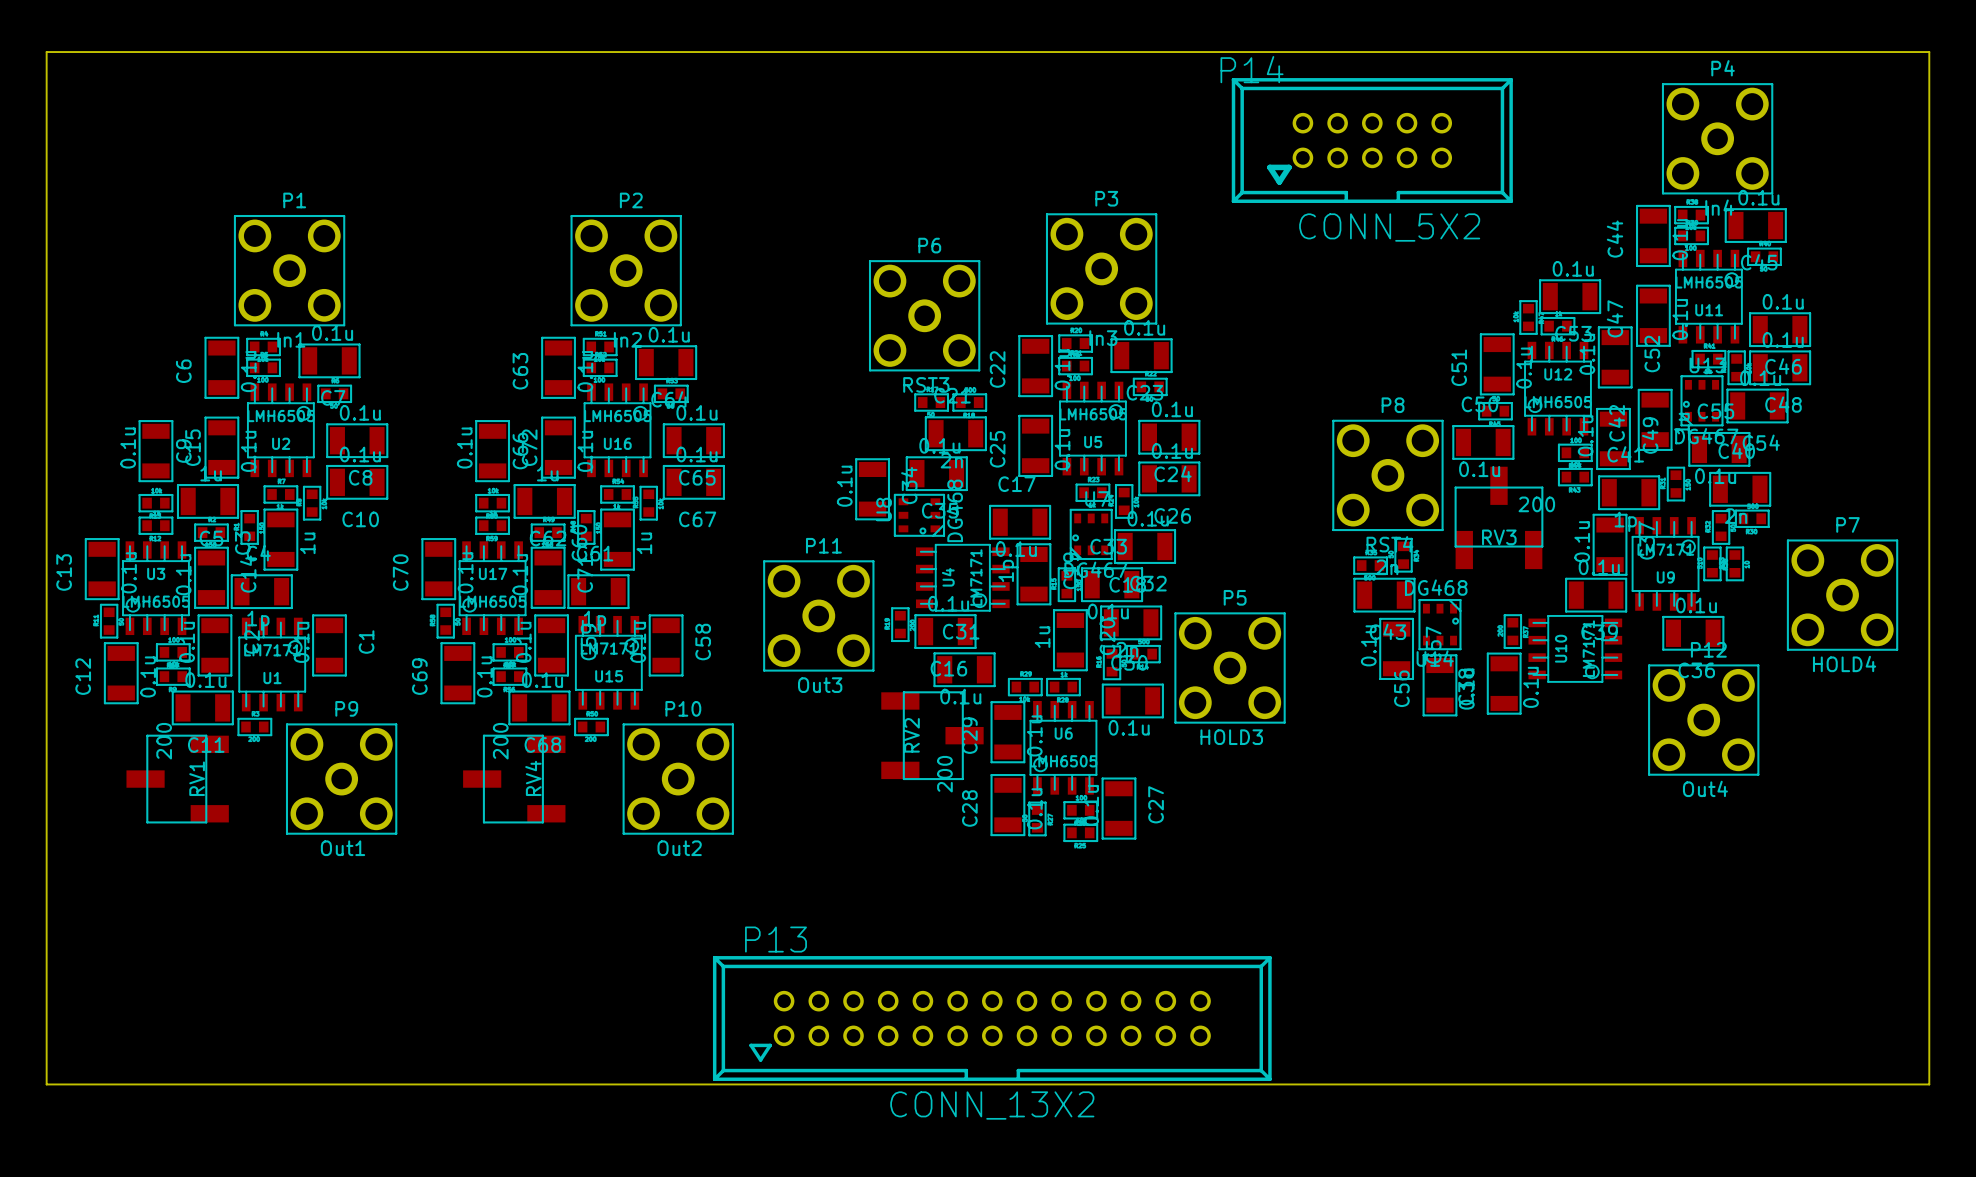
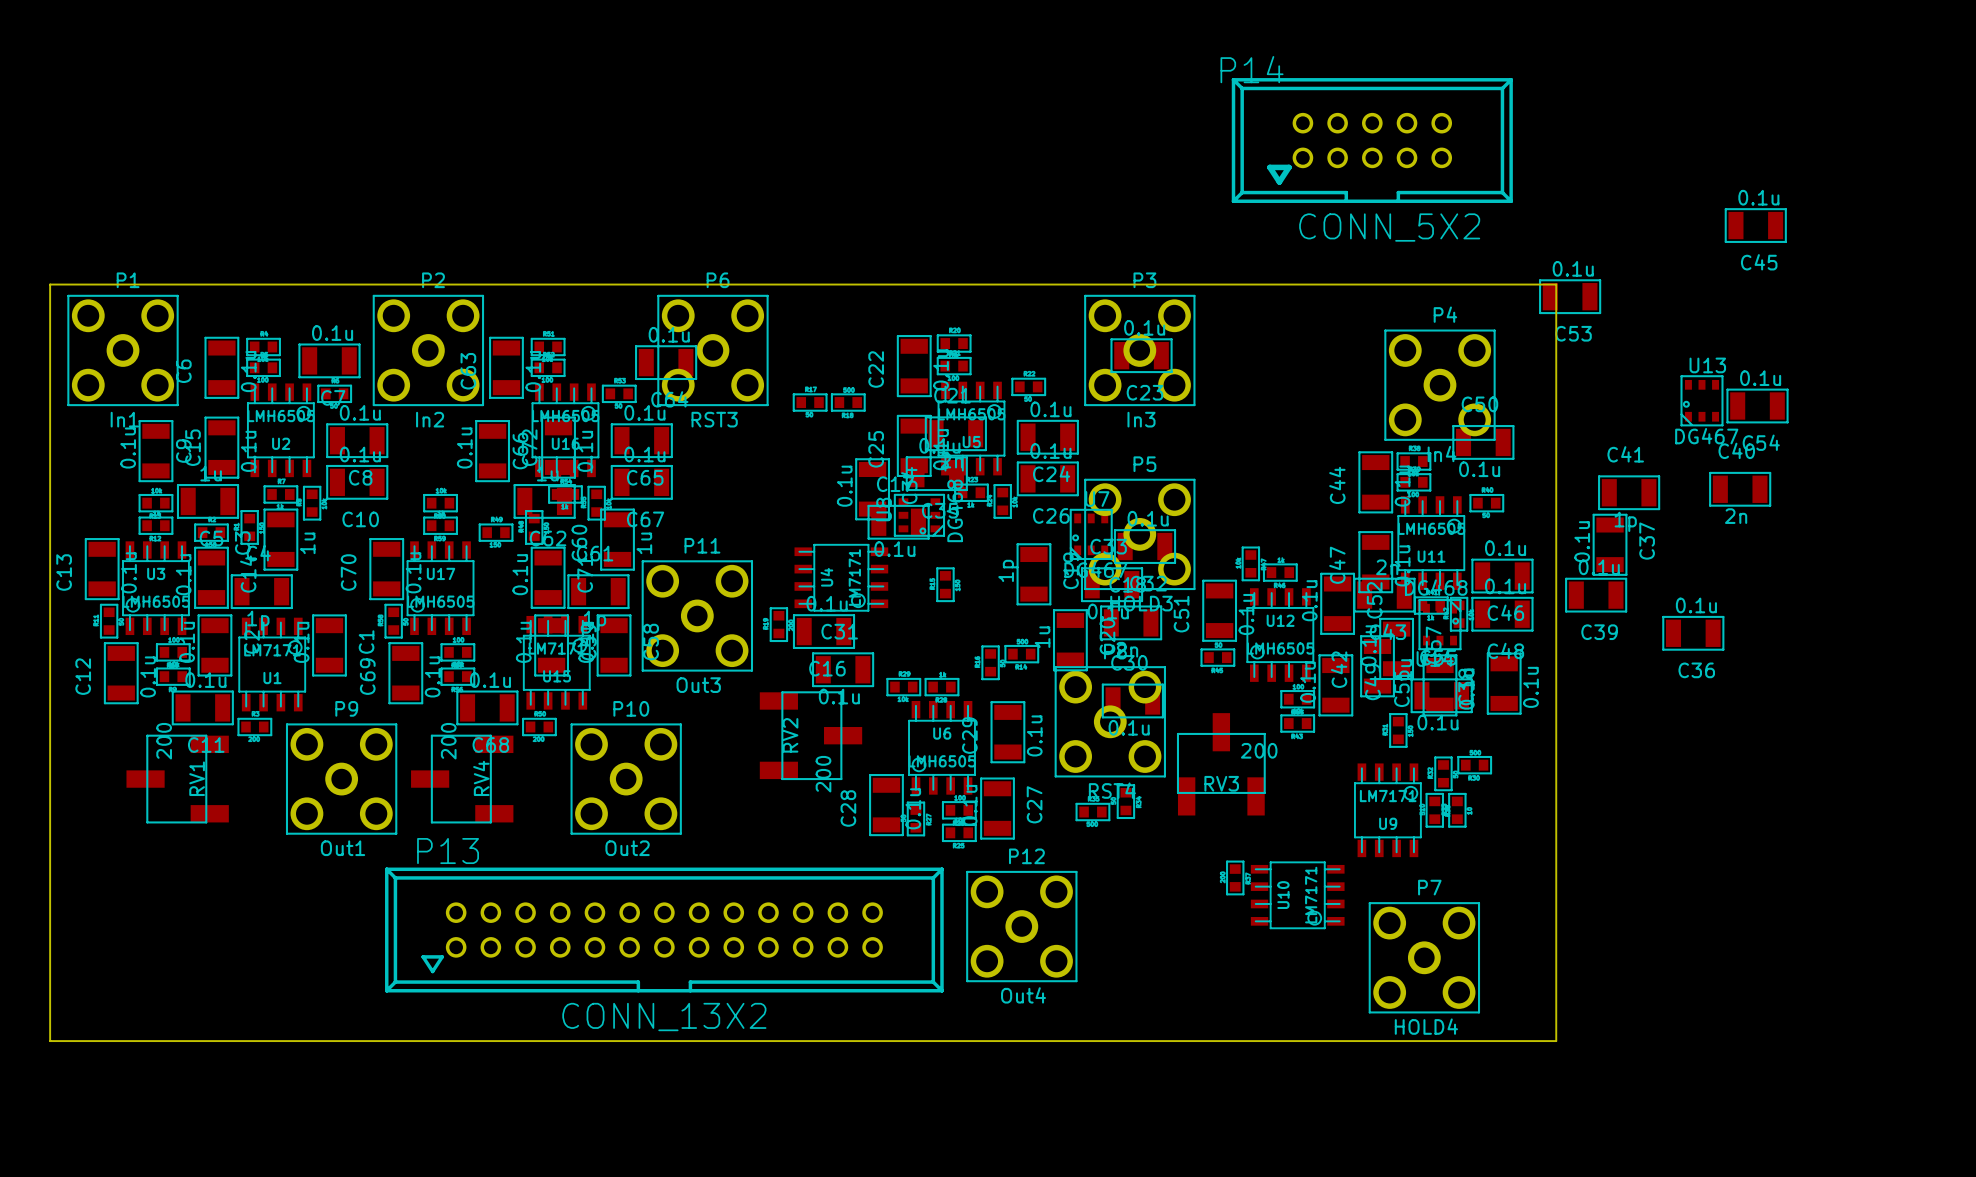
board edge: (46, 52) (46, 1084) (1929, 1084) (1929, 52) (46, 52) -> (50, 284) (50, 1041) (1556, 1041) (1556, 284) (50, 284)
P4 position: (1717, 138) -> (1439, 385)
part position: (1691, 215) -> (1413, 461)
C44 position: (1653, 235) -> (1375, 482)
part position: (1691, 235) -> (1413, 482)
part position: (1764, 256) -> (1486, 503)
P3 position: (1101, 268) -> (1139, 350)
P1 position: (289, 270) -> (123, 350)
P2 position: (626, 270) -> (428, 350)
U11 position: (1708, 296) -> (1431, 543)
P6 position: (924, 315) -> (712, 350)
C47 position: (1653, 315) -> (1375, 562)
part position: (1528, 317) -> (1250, 563)
part position: (1557, 326) -> (1280, 572)
C46 position: (1780, 329) -> (1502, 576)
part position: (1075, 343) -> (954, 343)
part position: (600, 347) -> (548, 347)
C52 position: (1615, 357) -> (1337, 603)
part position: (1708, 359) -> (1431, 605)
C51 position: (1497, 364) -> (1219, 610)
C22 position: (1035, 366) -> (914, 366)
part position: (1075, 366) -> (954, 366)
C63 position: (558, 367) -> (506, 367)
part position: (600, 367) -> (548, 367)
part position: (1736, 367) -> (1459, 614)
C48 position: (1780, 367) -> (1502, 614)
part position: (1150, 386) -> (1028, 386)
U12 position: (1557, 388) -> (1280, 635)
part position: (671, 393) -> (619, 393)
part position: (931, 402) -> (810, 402)
part position: (969, 402) -> (848, 402)
part position: (1495, 411) -> (1217, 657)
C42 position: (1655, 419) -> (1377, 666)
U5 position: (1092, 428) -> (971, 428)
U16 position: (617, 430) -> (565, 430)
C24 position: (1169, 437) -> (1047, 437)
C49 position: (1613, 438) -> (1335, 685)
C65 position: (693, 440) -> (641, 440)
C25 position: (1035, 445) -> (914, 445)
C55 position: (1719, 449) -> (1441, 695)
part position: (1575, 452) -> (1297, 699)
P8 position: (1387, 475) -> (1110, 721)
part position: (1575, 477) -> (1297, 723)
C26 position: (1169, 478) -> (1047, 478)
C67 position: (693, 482) -> (641, 482)
part position: (1675, 484) -> (1398, 730)
part position: (1092, 492) -> (971, 492)
part position: (617, 494) -> (565, 494)
part position: (1124, 501) -> (1002, 501)
part position: (492, 503) -> (440, 503)
part position: (648, 503) -> (596, 503)
RV3 position: (1498, 517) -> (1221, 764)
part position: (1752, 518) -> (1474, 765)
C17 position: (1020, 522) -> (898, 522)
part position: (492, 525) -> (440, 525)
part position: (586, 527) -> (534, 527)
part position: (1721, 527) -> (1443, 773)
part position: (548, 532) -> (496, 532)
part position: (1403, 555) -> (1125, 801)
U9 position: (1665, 563) -> (1387, 810)
part position: (1712, 563) -> (1434, 810)
part position: (1734, 563) -> (1457, 810)
part position: (1370, 565) -> (1092, 812)
C70 position: (438, 569) -> (386, 569)
U4 position: (962, 577) -> (841, 577)
part position: (1066, 584) -> (945, 584)
U17 position: (492, 588) -> (440, 588)
P7 position: (1842, 595) -> (1424, 957)
P11 position: (818, 615) -> (697, 615)
part position: (445, 621) -> (393, 621)
part position: (900, 624) -> (778, 624)
C16 position: (945, 631) -> (824, 631)
part position: (1512, 631) -> (1235, 877)
C58 position: (666, 645) -> (614, 645)
U10 position: (1575, 648) -> (1297, 895)
part position: (509, 652) -> (457, 652)
part position: (1143, 654) -> (1021, 654)
U15 position: (608, 662) -> (556, 662)
part position: (1112, 662) -> (990, 662)
P5 position: (1230, 668) -> (1139, 534)
C31 position: (964, 669) -> (843, 669)
C69 position: (457, 673) -> (405, 673)
part position: (509, 676) -> (457, 676)
part position: (1025, 687) -> (903, 687)
part position: (1063, 687) -> (941, 687)
C68 position: (539, 707) -> (487, 707)
P12 position: (1703, 720) -> (1021, 926)
part position: (591, 727) -> (539, 727)
RV2 position: (932, 735) -> (810, 735)
U6 position: (1063, 747) -> (941, 747)
RV4 position: (514, 779) -> (462, 779)
P10 position: (678, 779) -> (626, 779)
C28 position: (1007, 805) -> (886, 805)
C27 position: (1118, 808) -> (997, 808)
part position: (1080, 810) -> (959, 810)
part position: (1037, 818) -> (915, 818)
part position: (1080, 832) -> (959, 832)
P13 position: (992, 1018) -> (664, 930)

